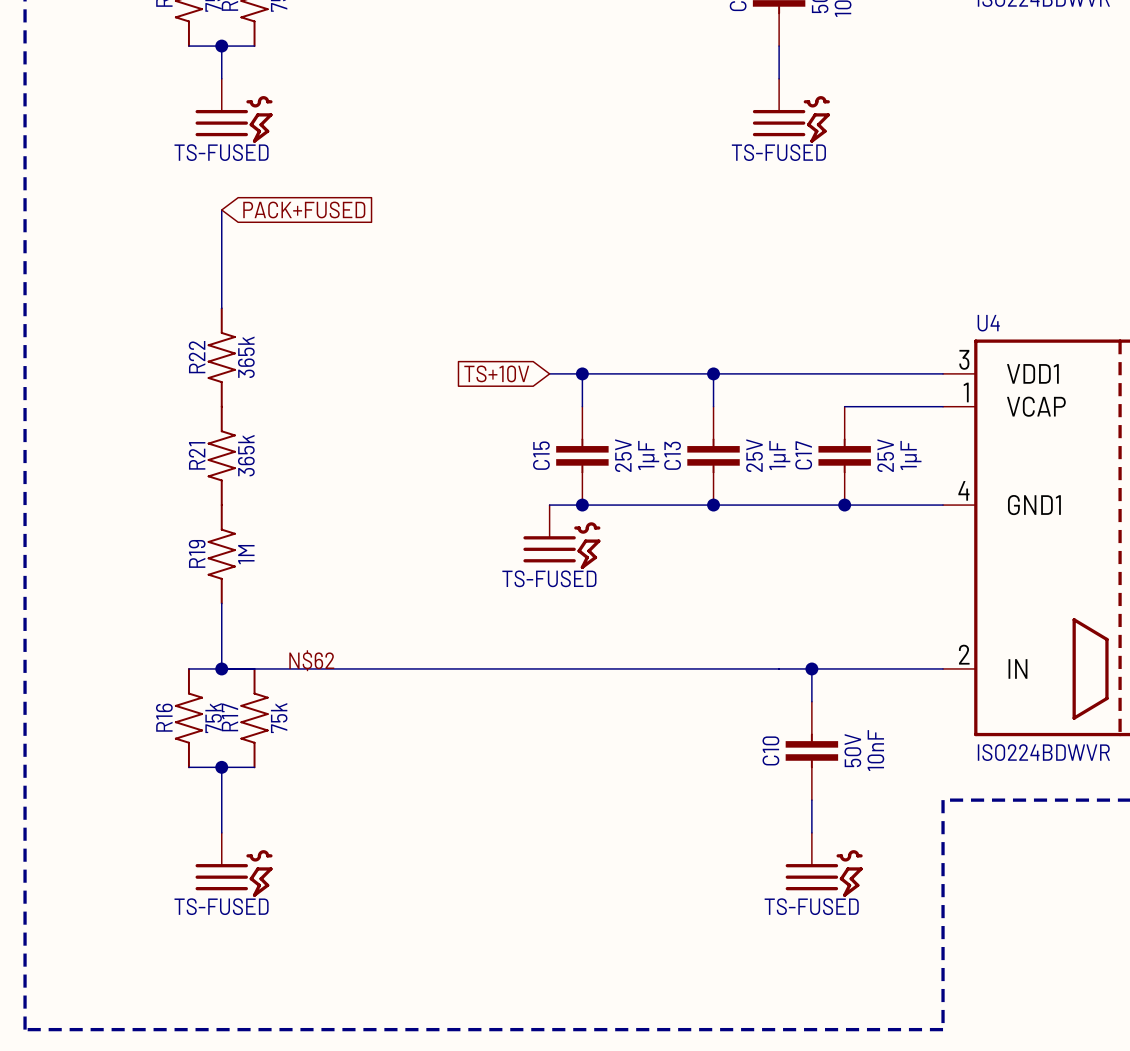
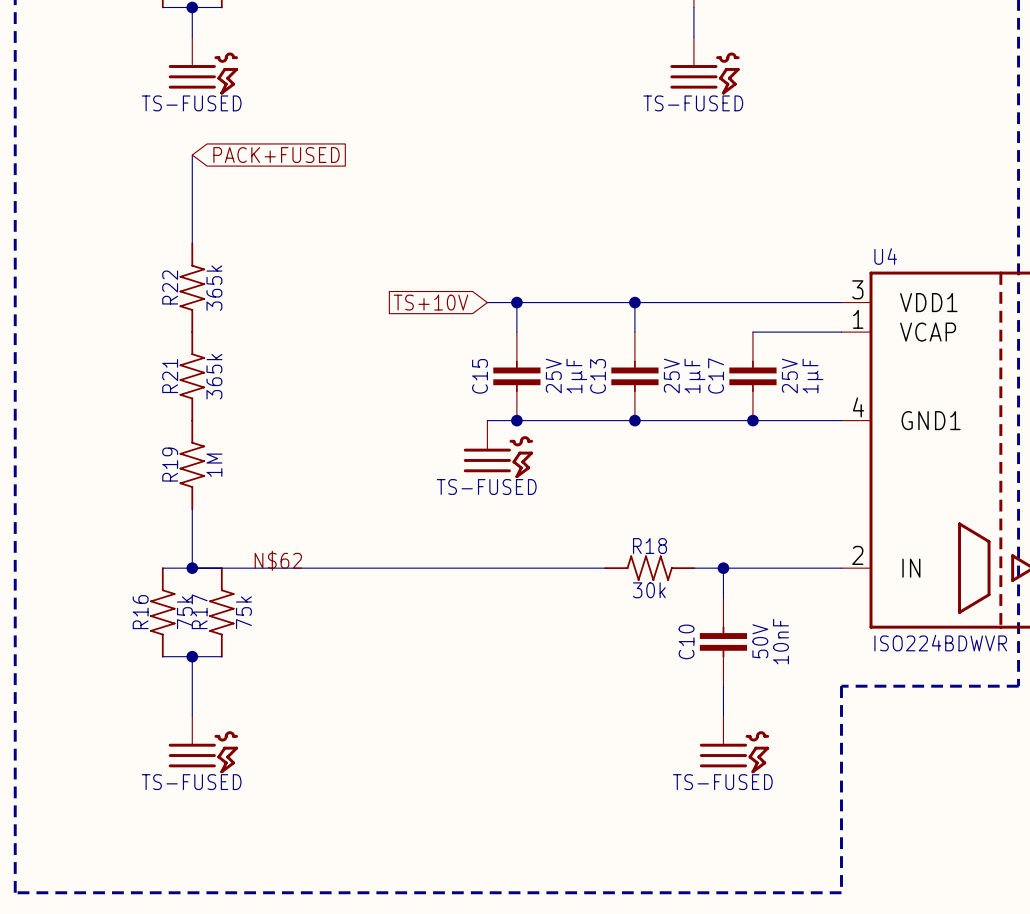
R18: none -> (649, 568)

